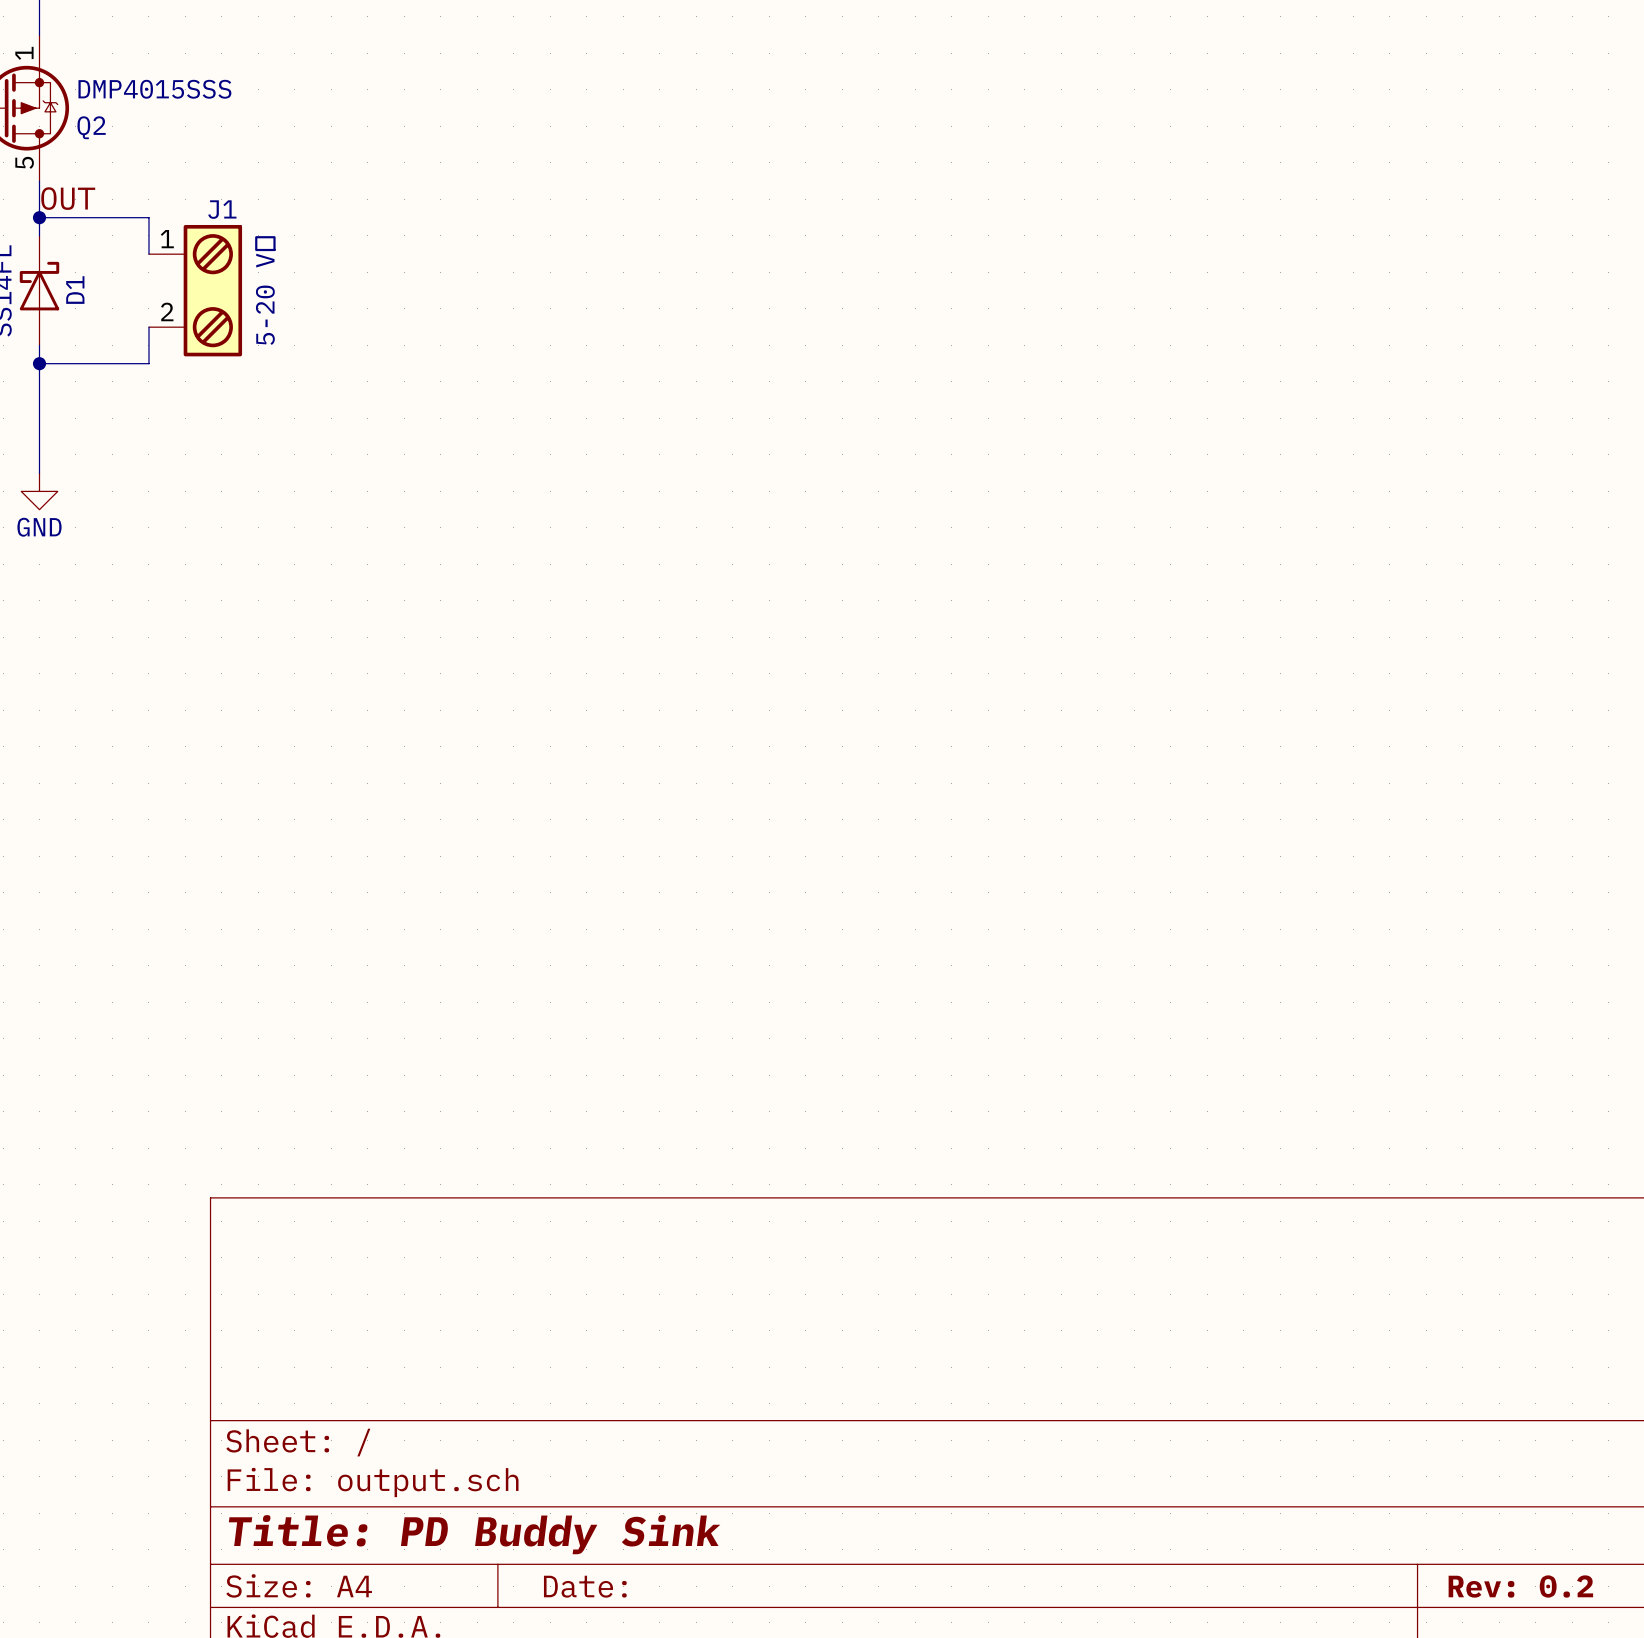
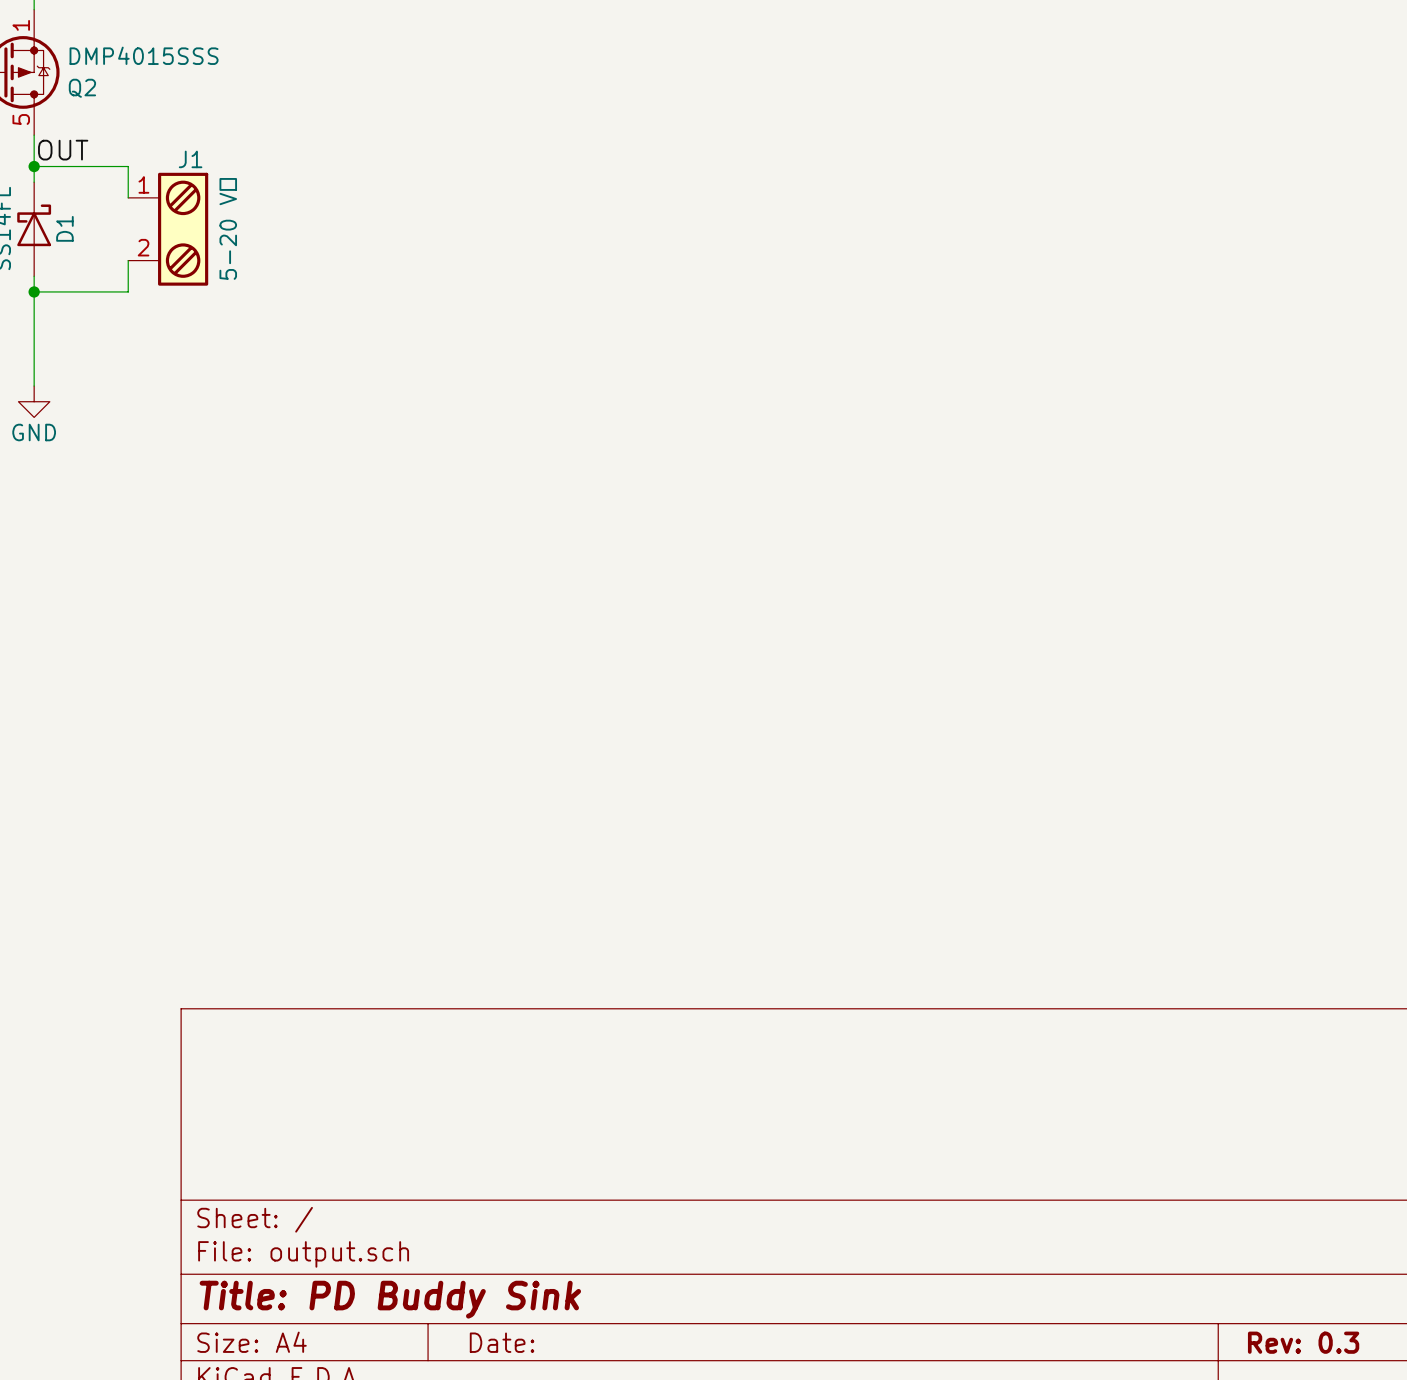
title block: Rev: 0.2 (1520, 1586) -> Rev: 0.3 (1303, 1342)

